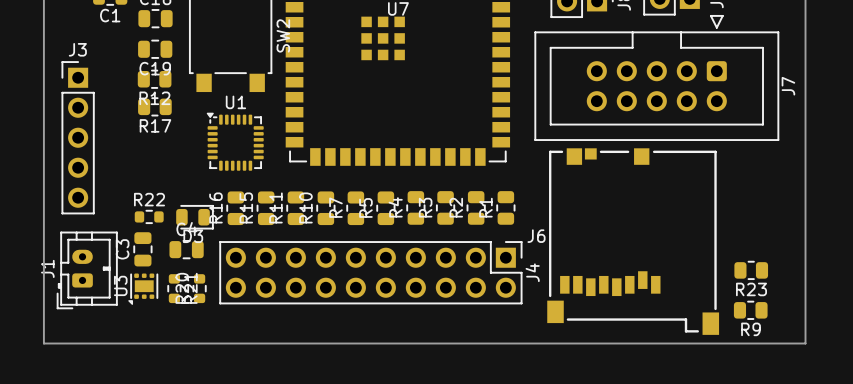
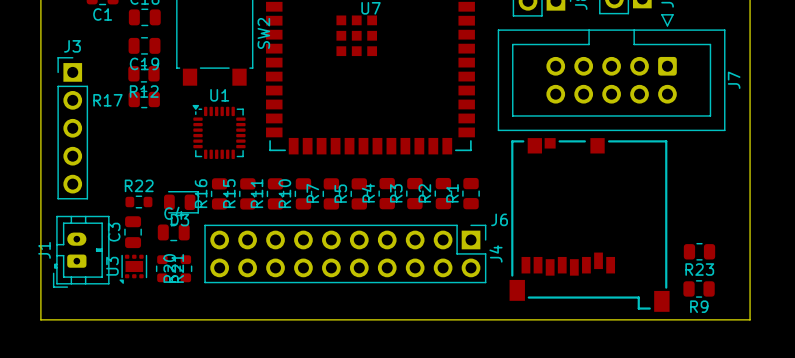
R17 name position: R17 (155, 125) -> R17 (107, 100)

